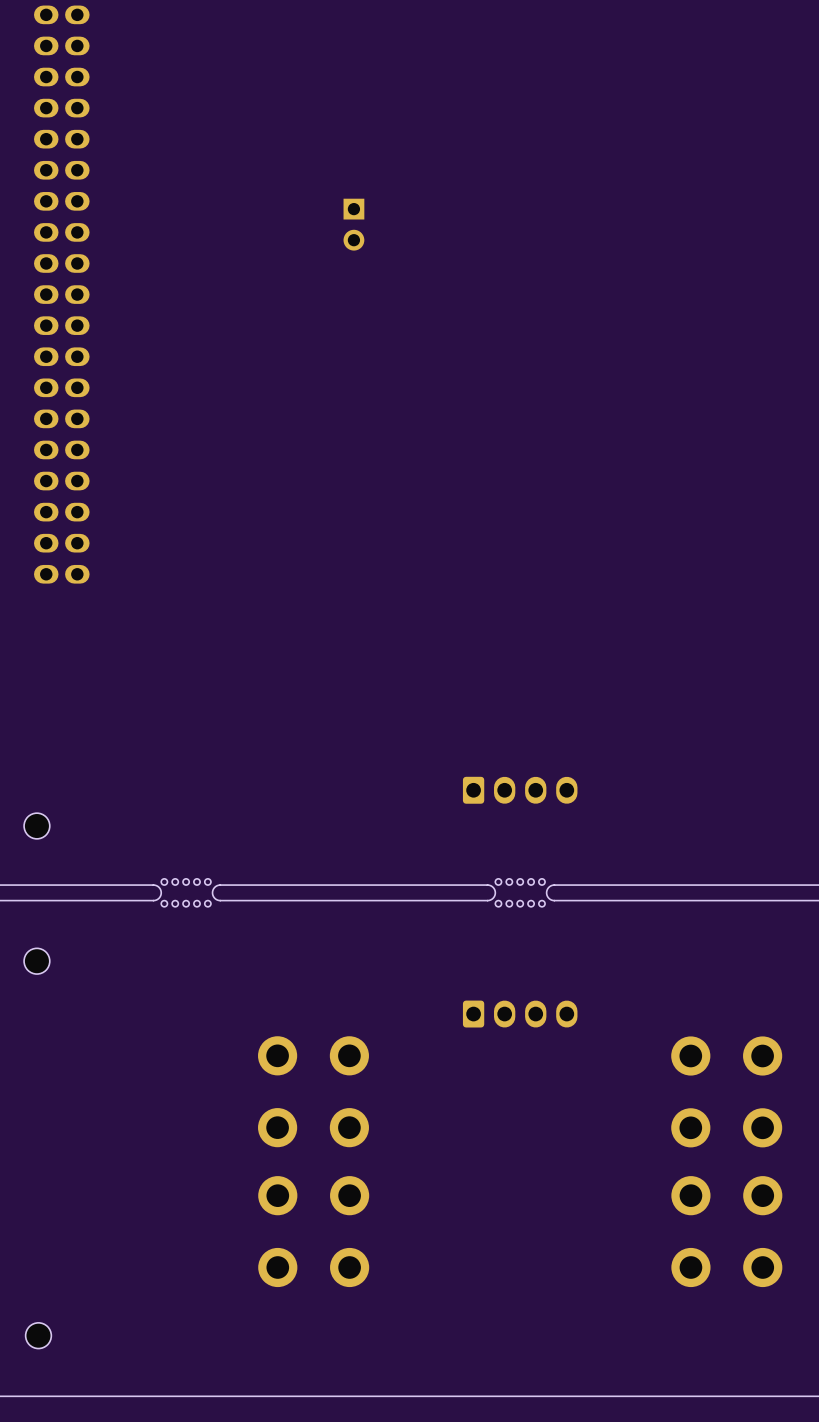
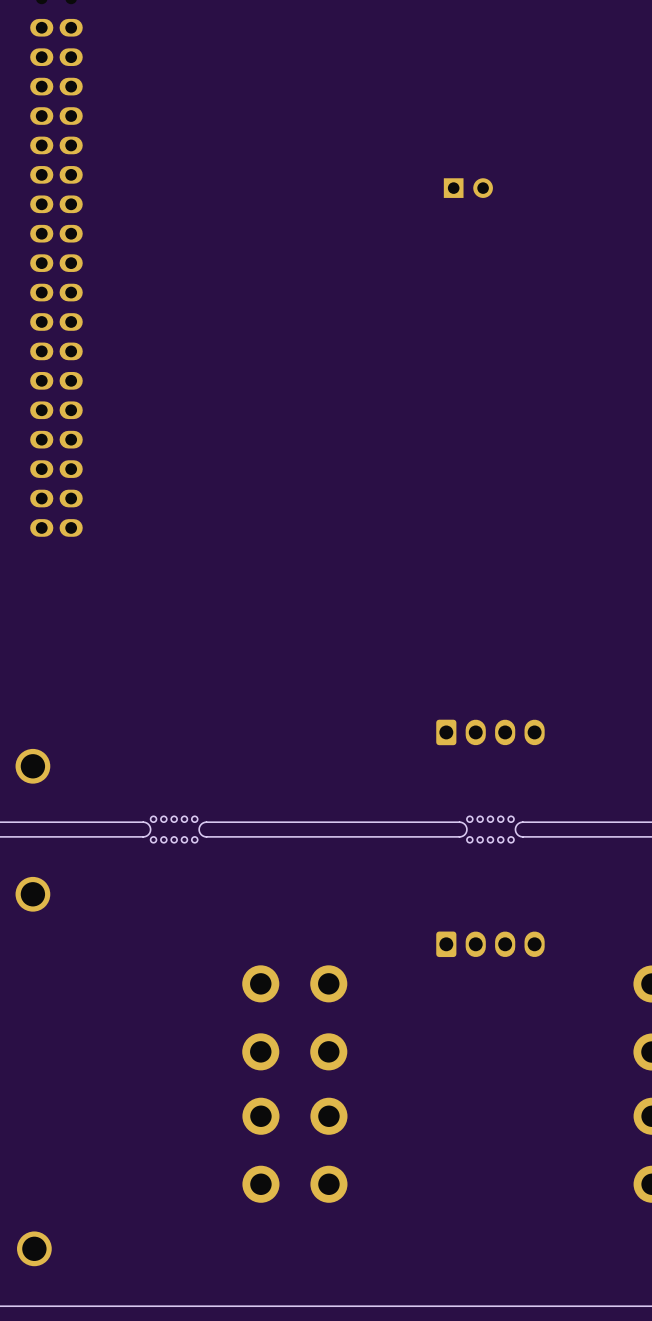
part rotation: 0° (353, 224) -> 90° counterclockwise (468, 188)
part position: (353, 224) -> (468, 188)
part footprint: [24, 813, 50, 839] -> [15, 748, 51, 784]
part footprint: [24, 948, 50, 975] -> [15, 876, 51, 912]
part footprint: [25, 1322, 52, 1349] -> [17, 1231, 52, 1267]

